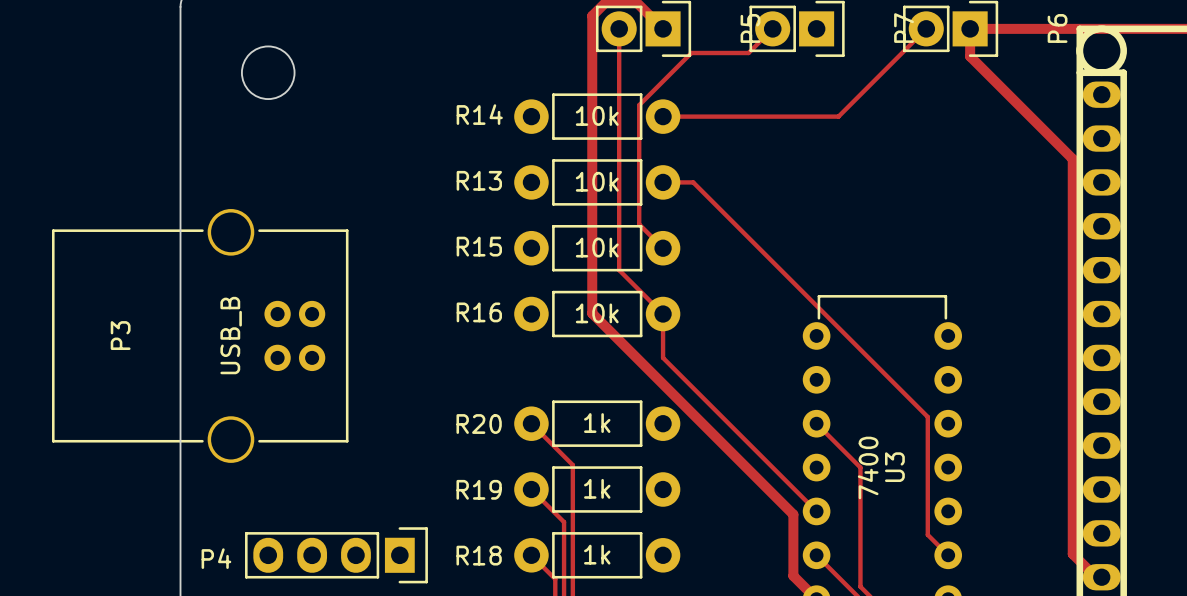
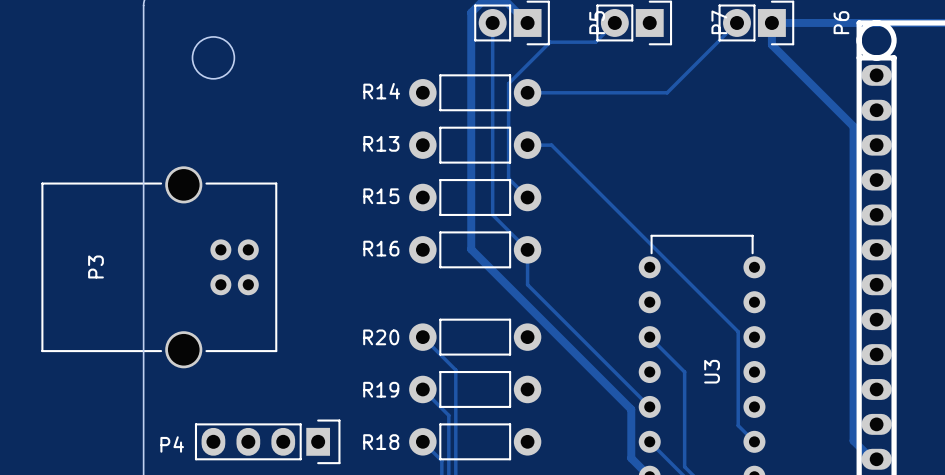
R14 value: 10k (597, 115) -> none
R13 value: 10k (597, 181) -> none
R15 value: 10k (597, 247) -> none
R16 value: 10k (597, 313) -> none
P3 value: USB_B (231, 335) -> none
R20 value: 1k (597, 423) -> none
U3 value: 7400 (868, 467) -> none
R19 value: 1k (597, 488) -> none
R18 value: 1k (597, 554) -> none

